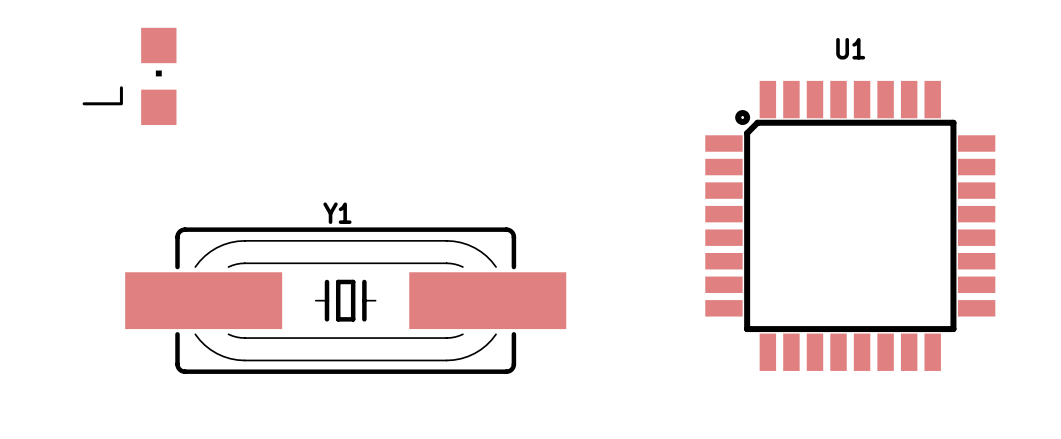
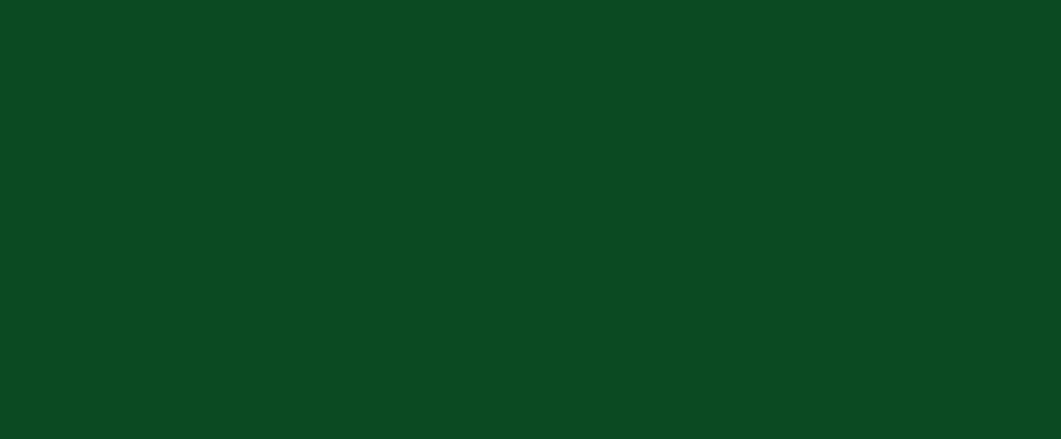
L: (158, 76) -> none
U1: (850, 225) -> none
Y1: (345, 300) -> none

